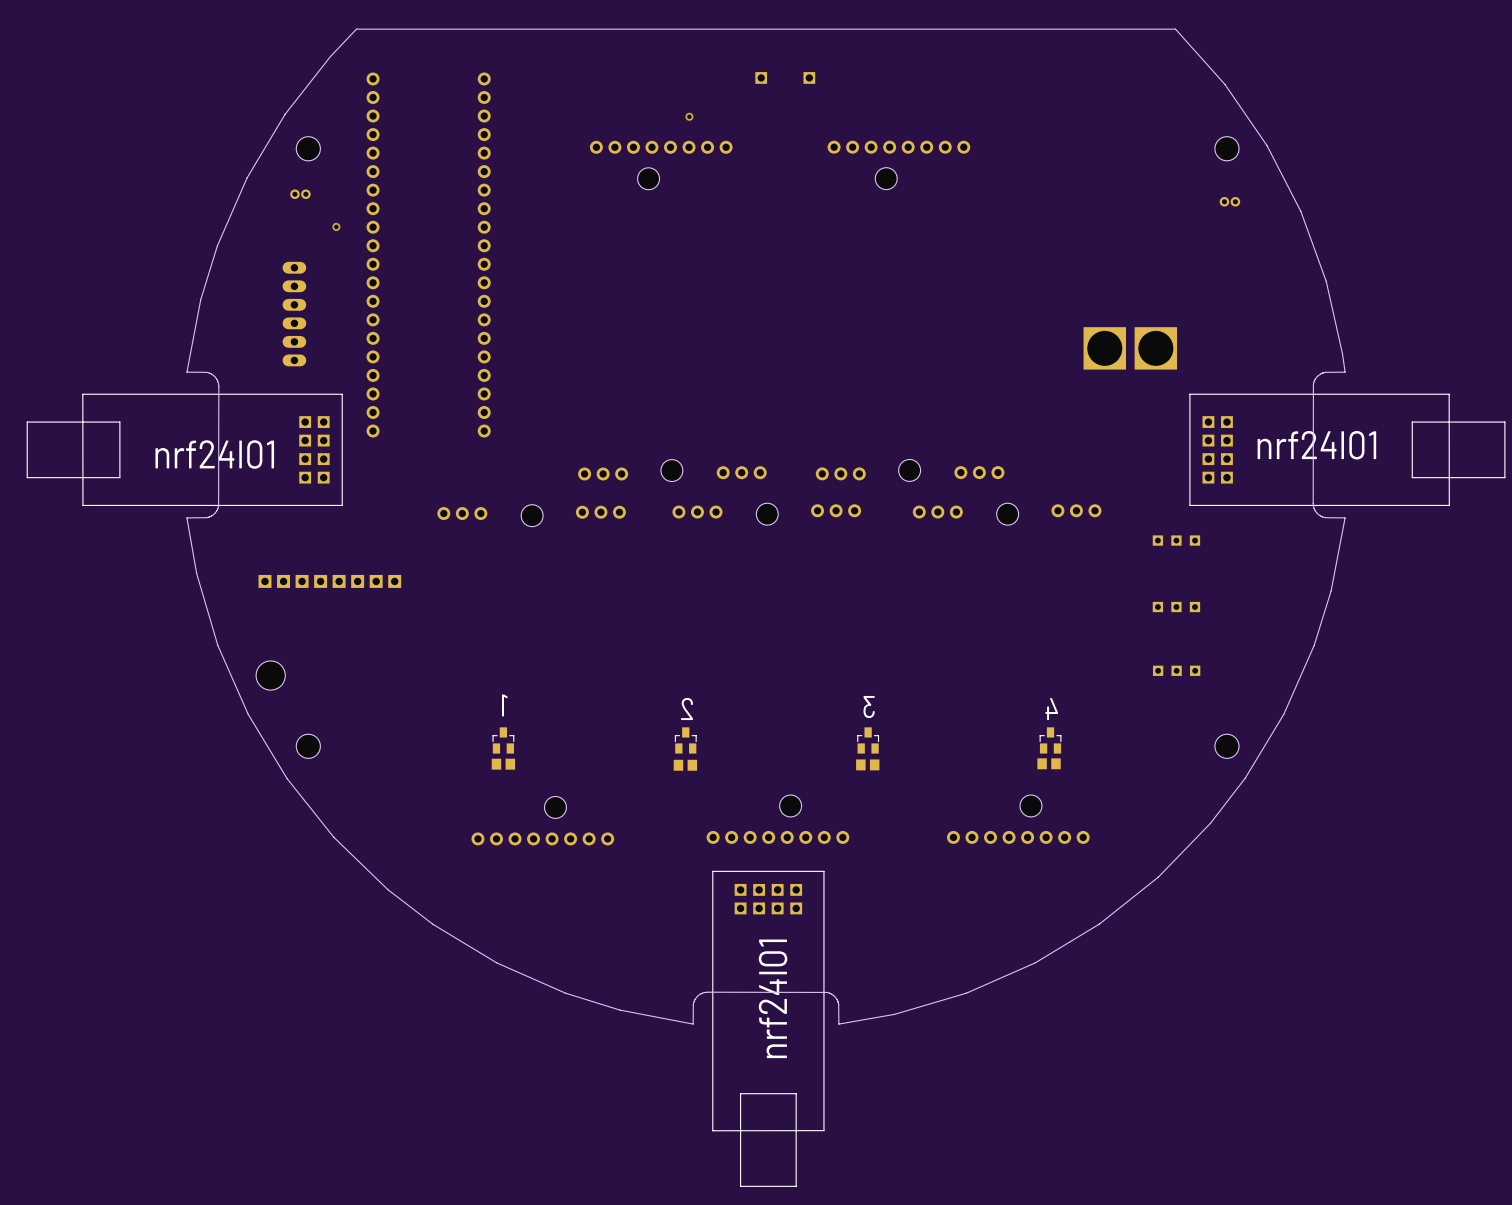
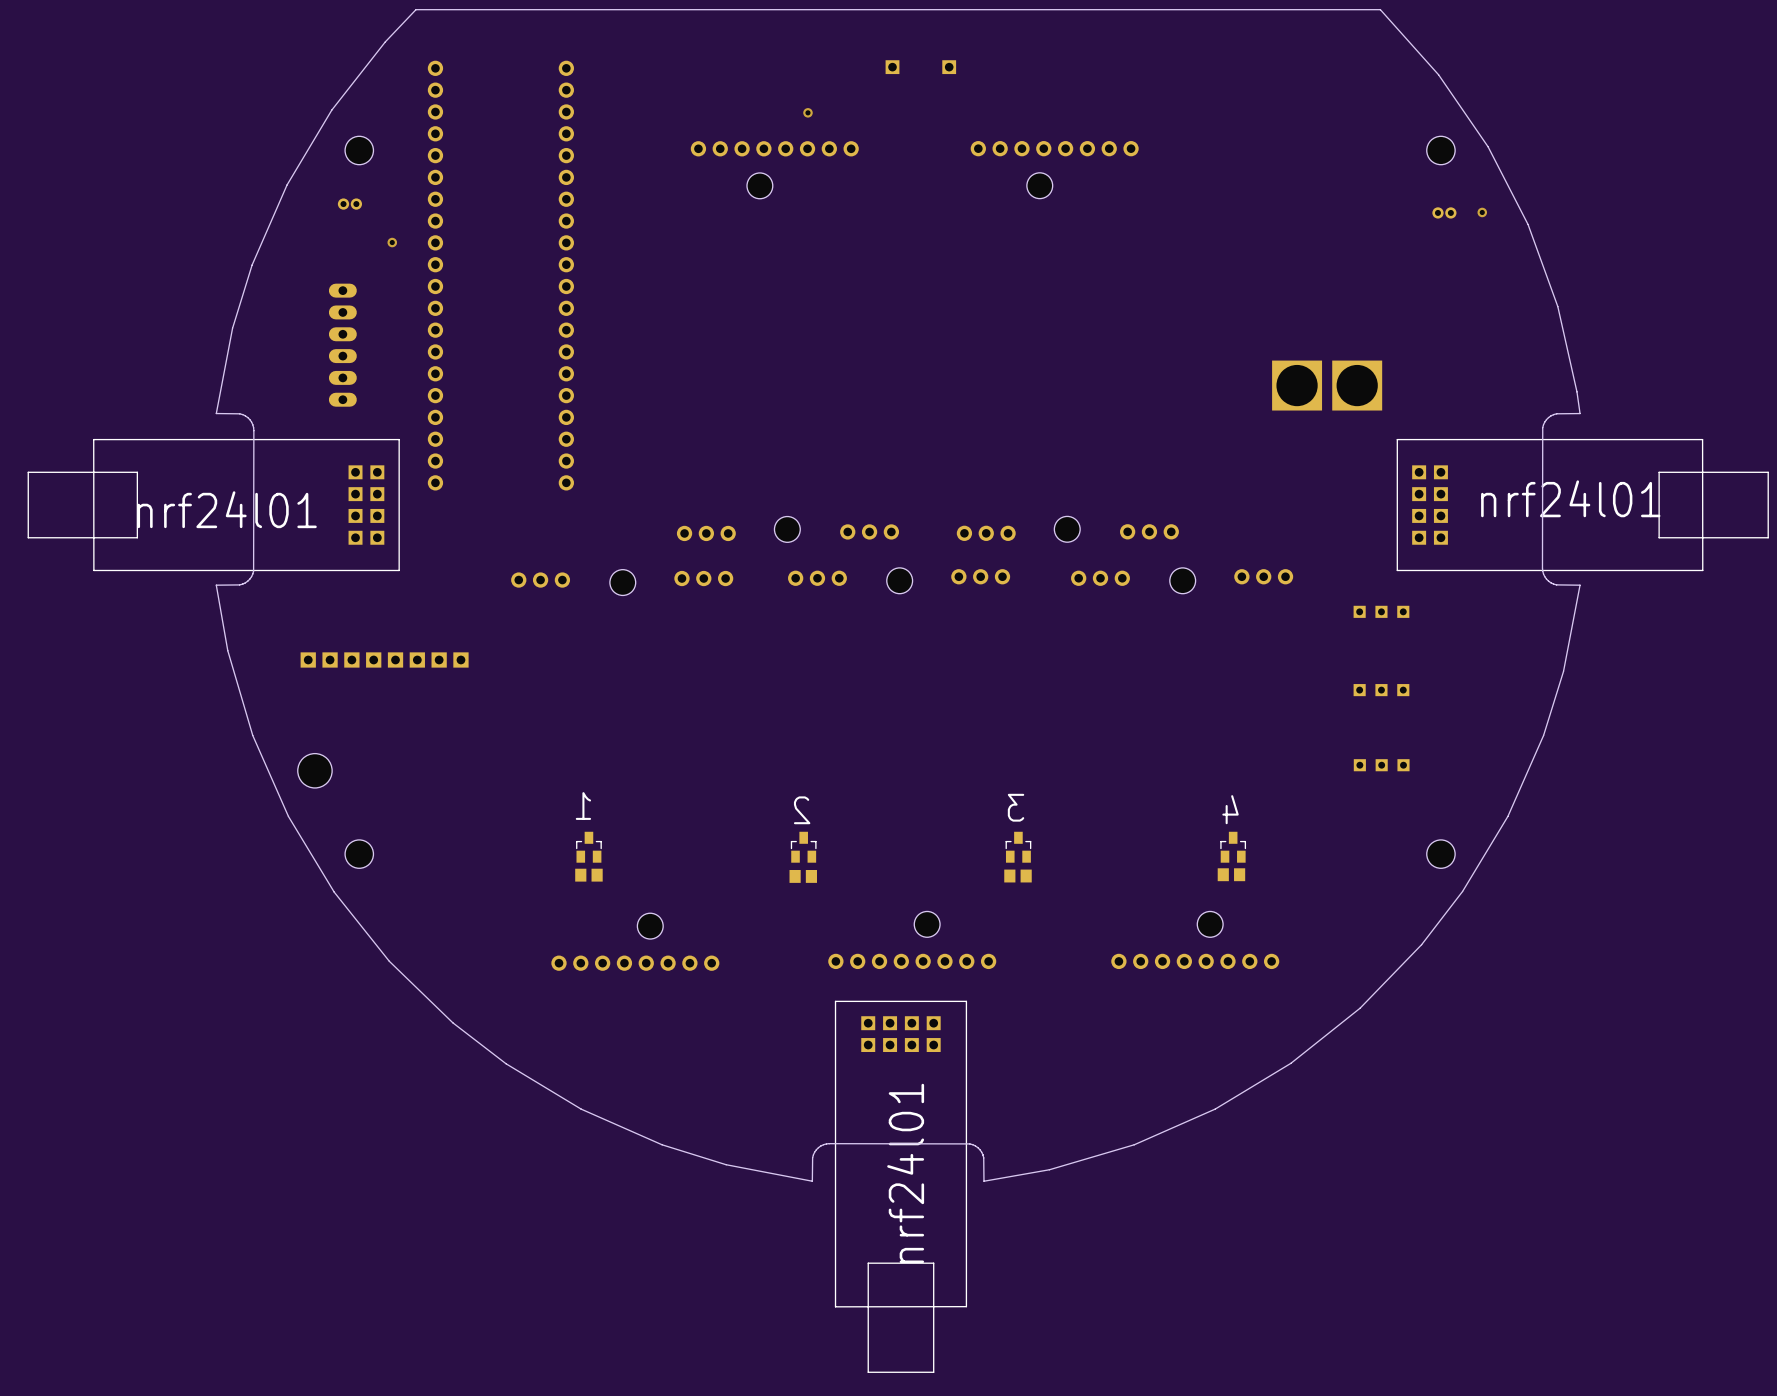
via: none -> (1482, 212)

